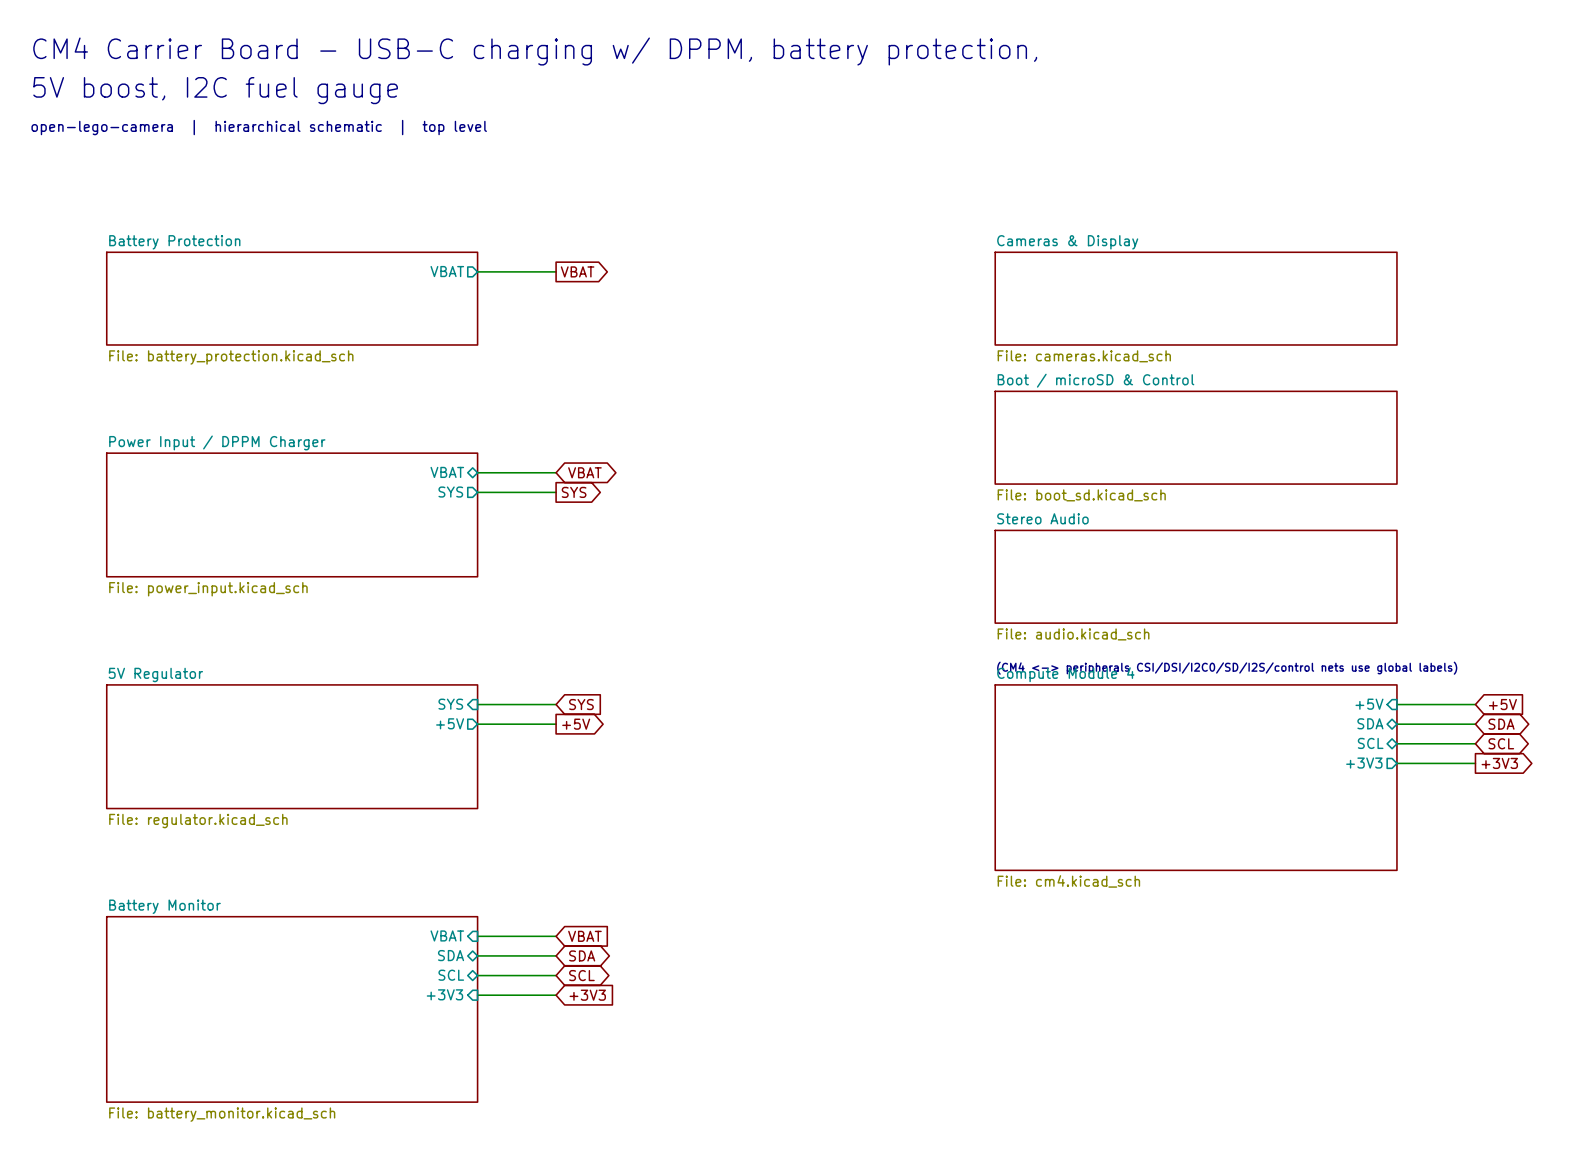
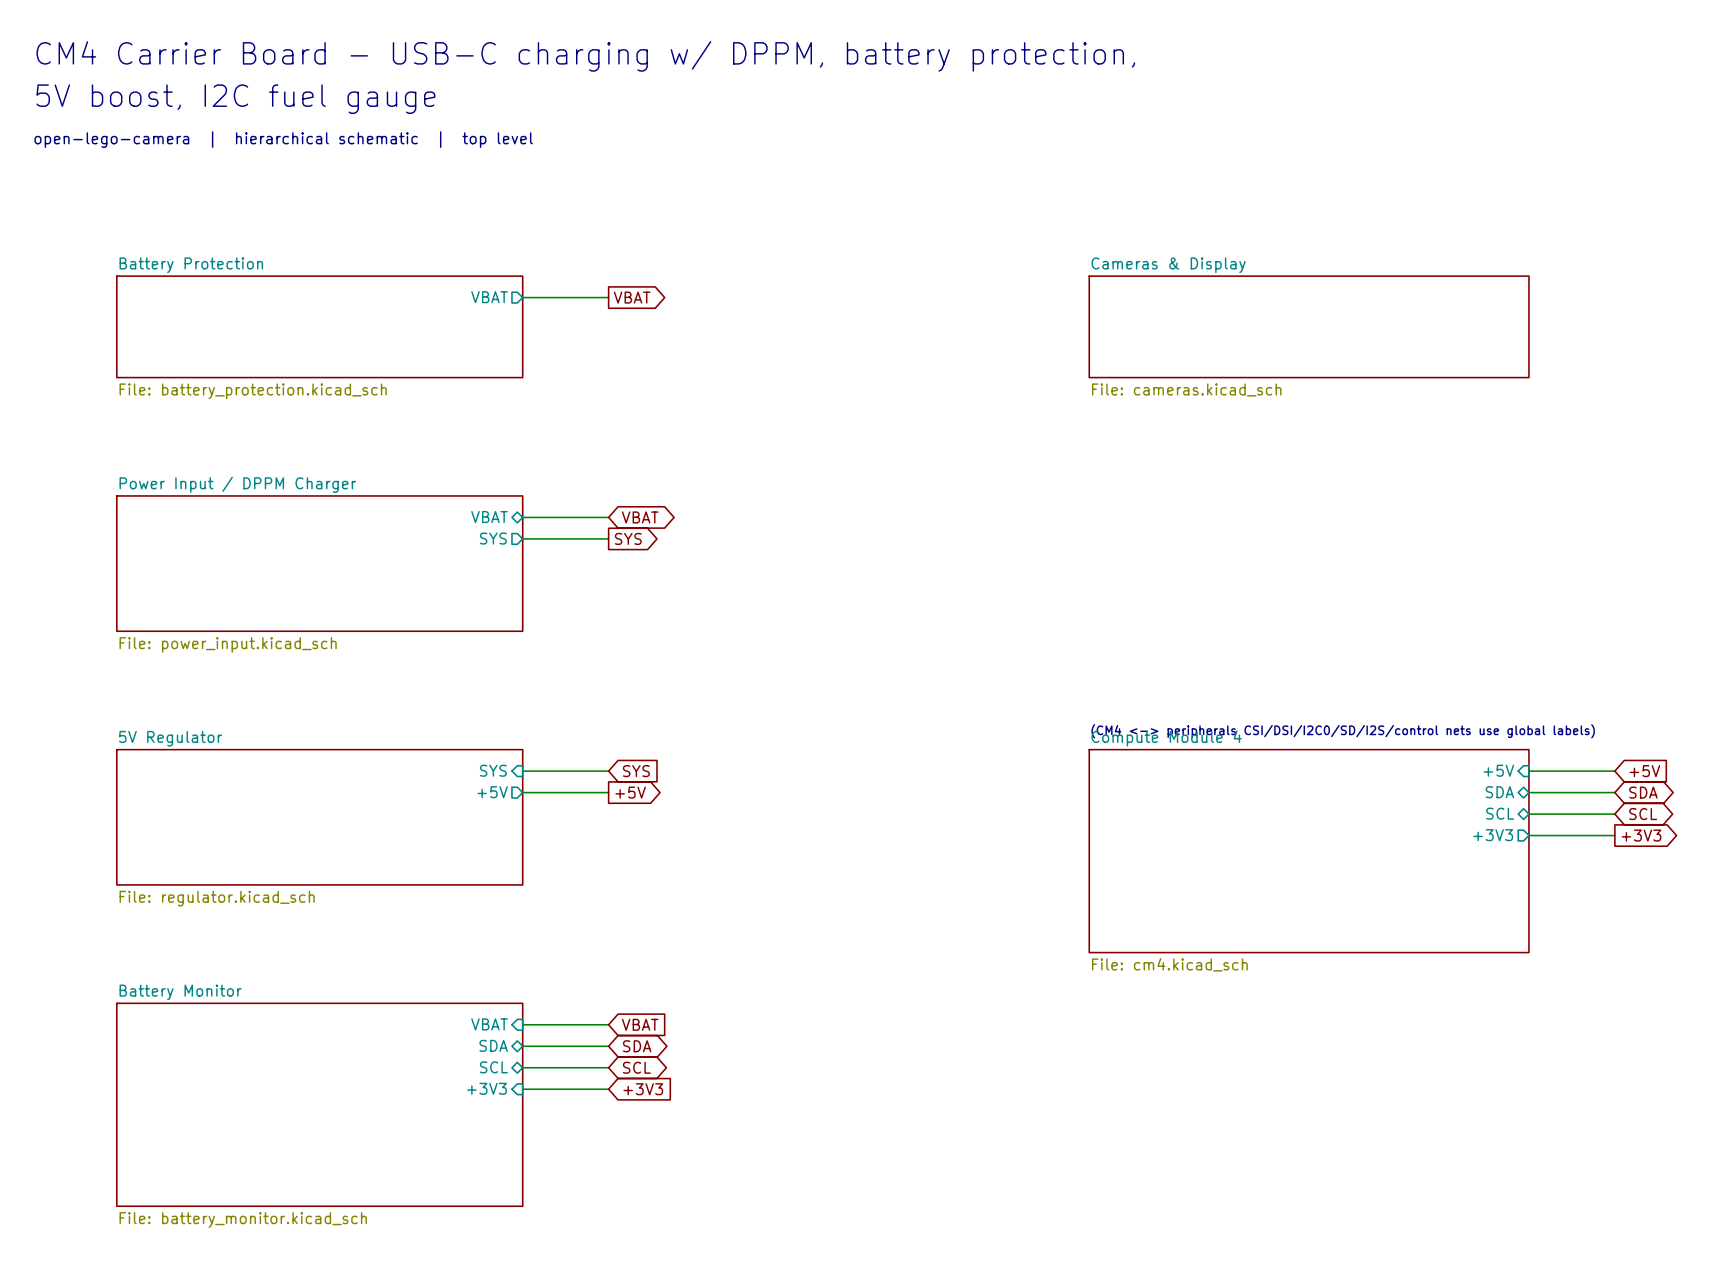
sheet Boot / microSD & Control: File: boot_sd.kicad_sch (1196, 437) -> none
sheet Stereo Audio: File: audio.kicad_sch (1196, 576) -> none

